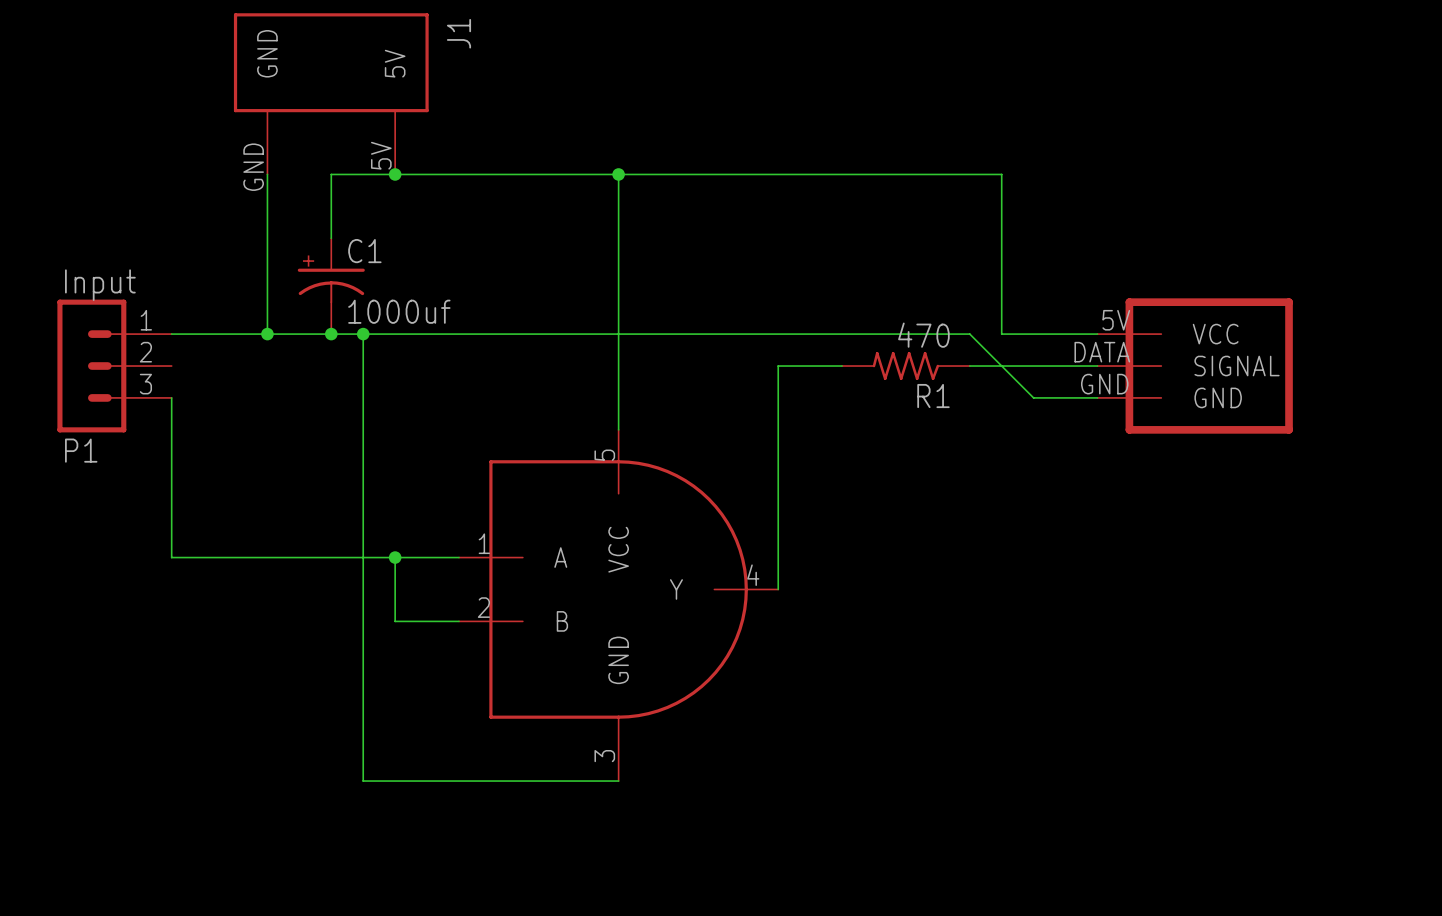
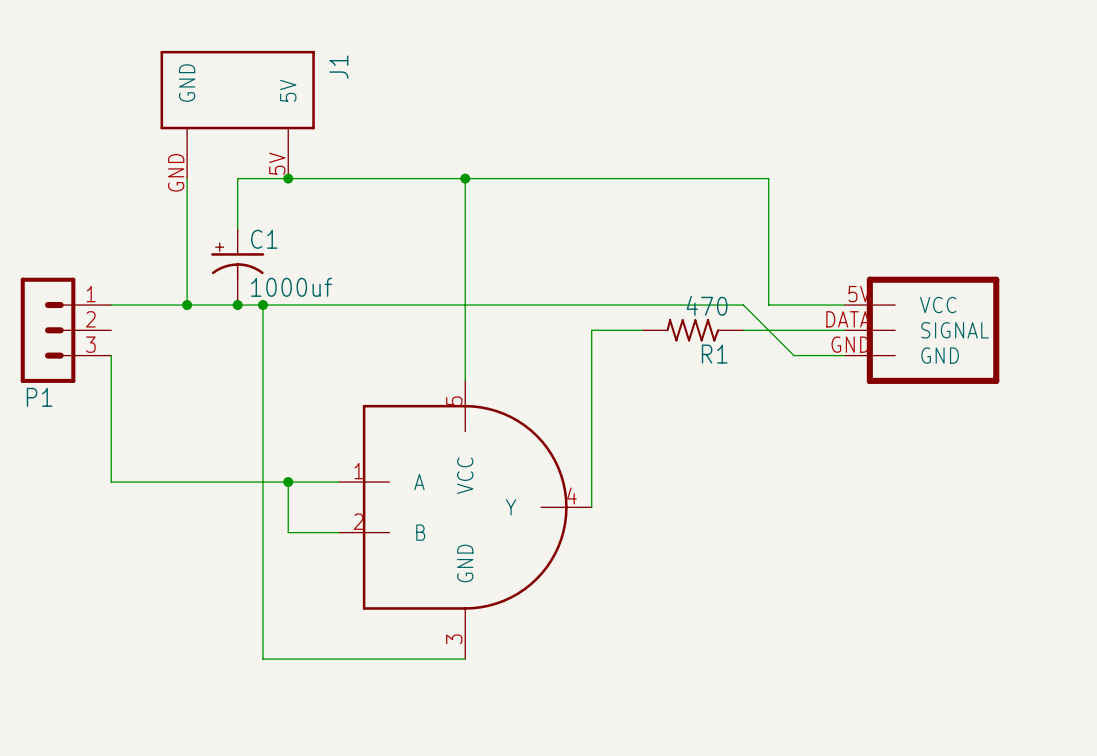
P1 value: Input (100, 285) -> none

